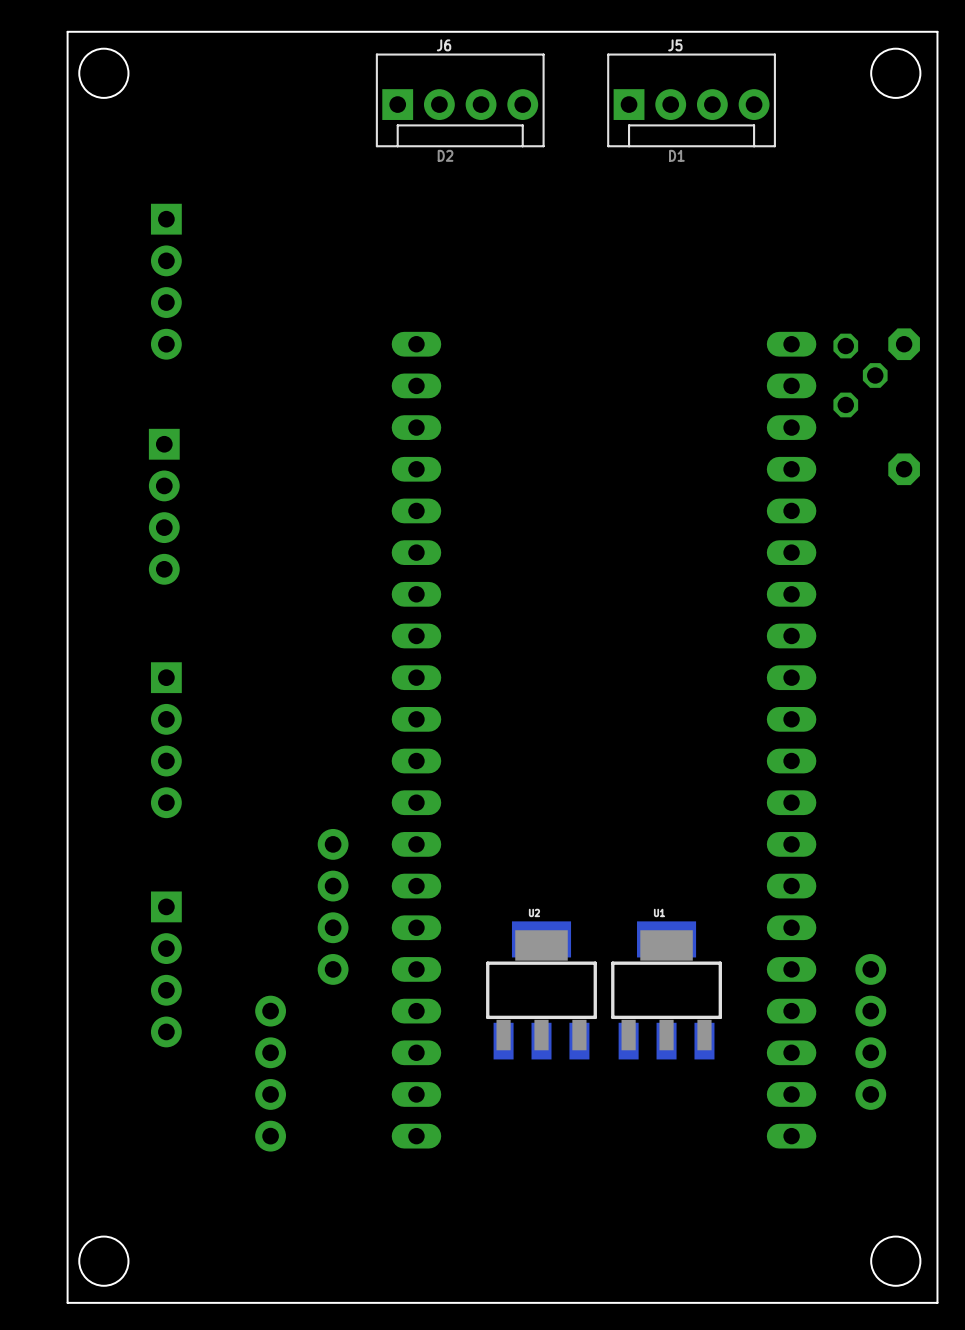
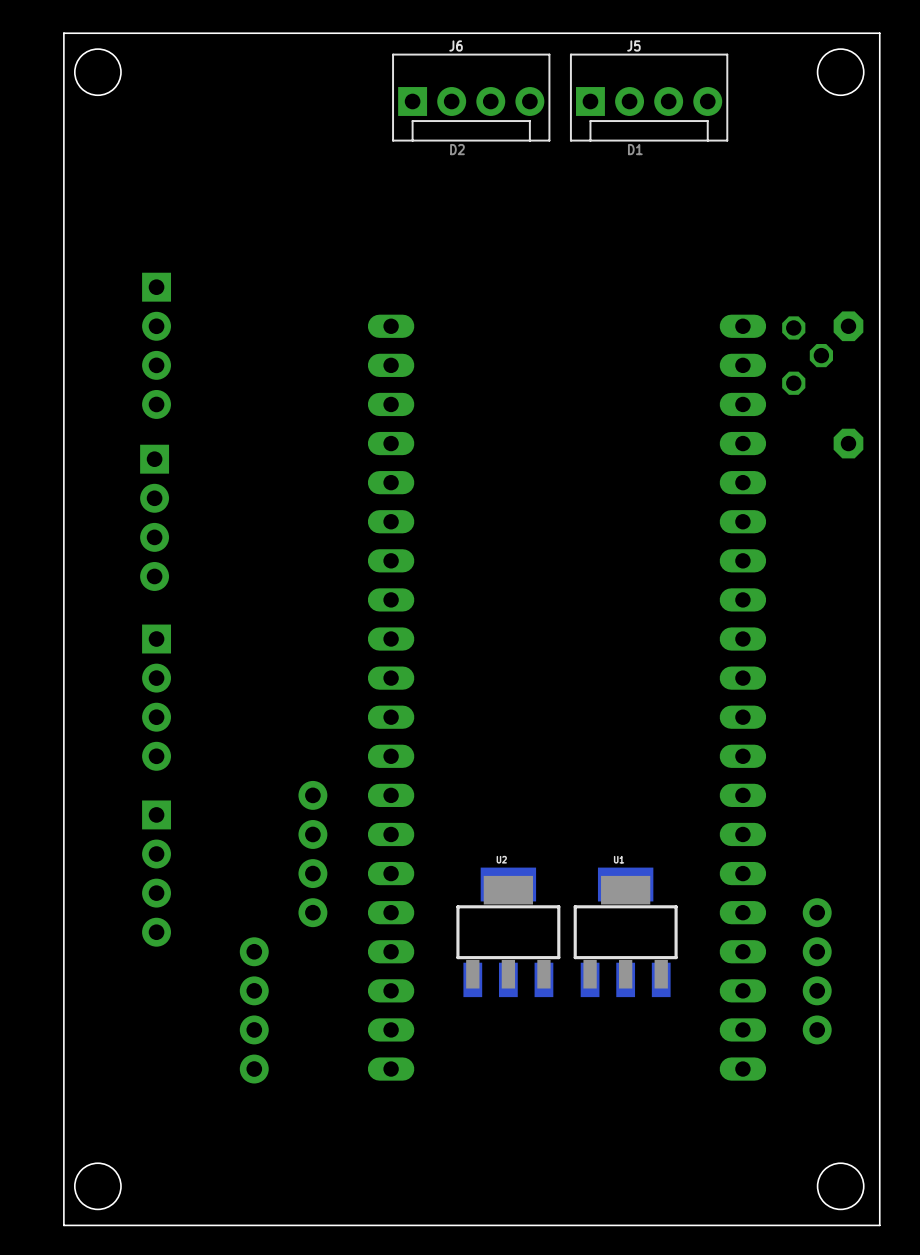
J6 position: (460, 100) -> (471, 97)
part: (166, 281) -> none
part: none -> (156, 345)
part position: (164, 506) -> (154, 517)
part position: (166, 969) -> (156, 873)

